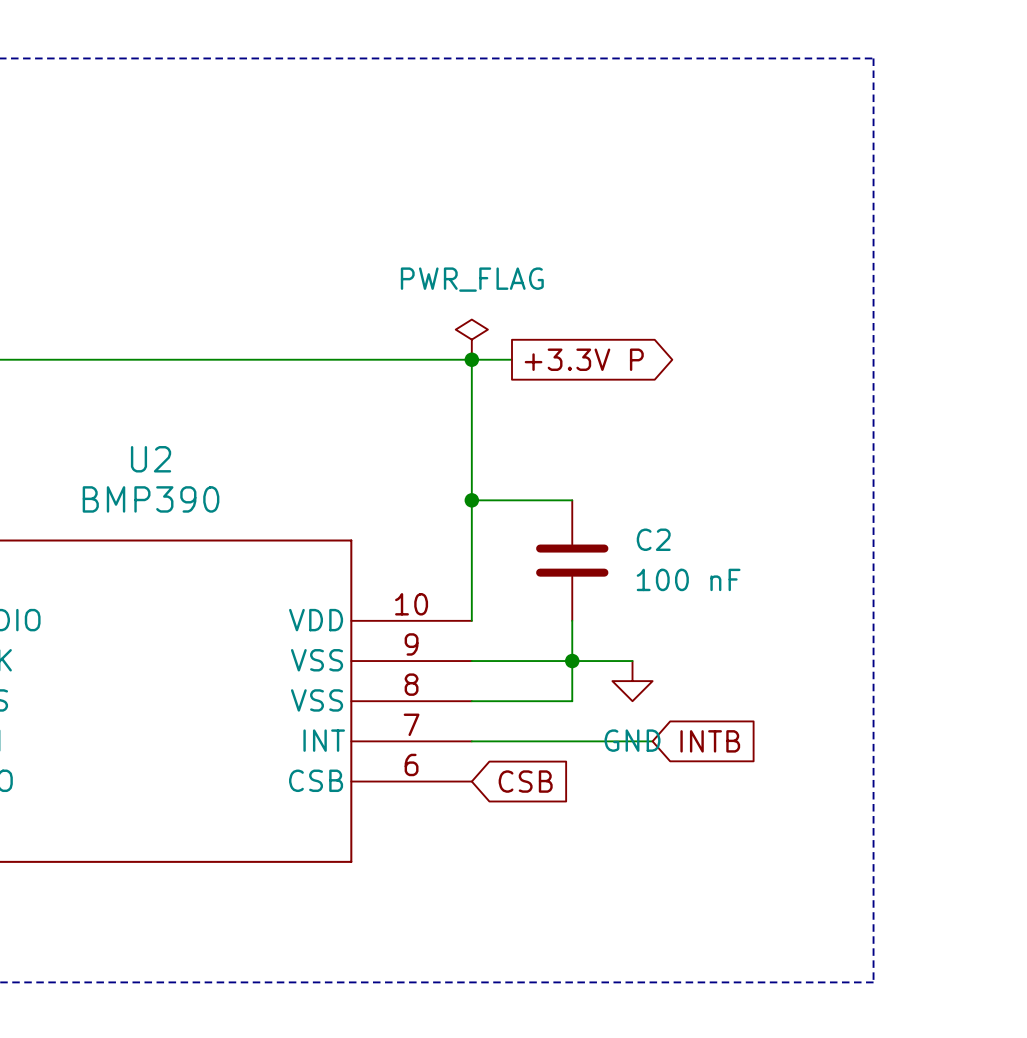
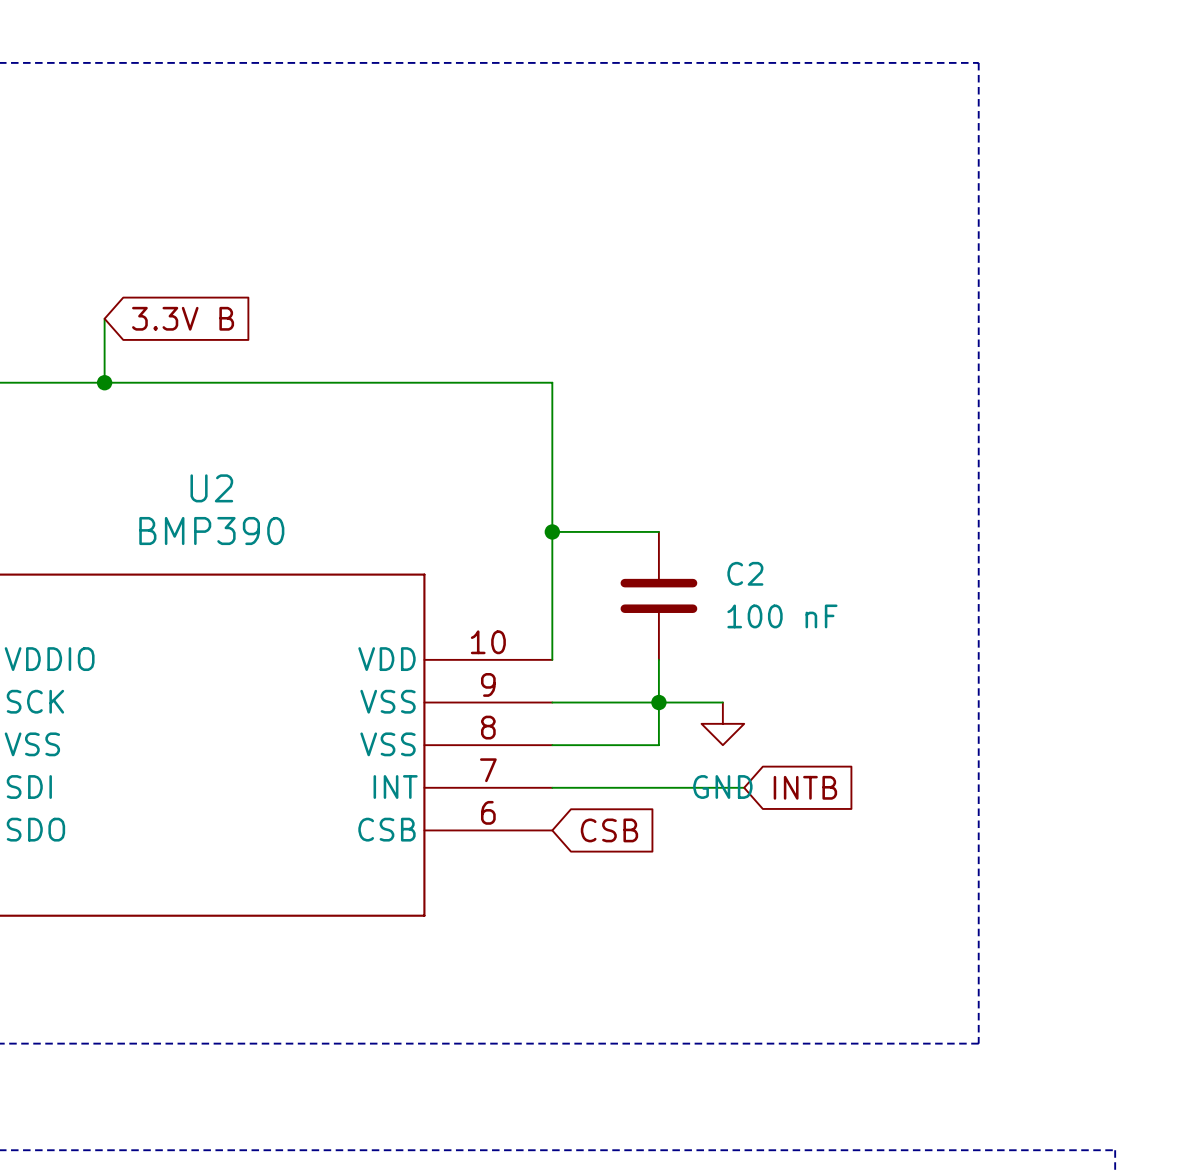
wire: none -> (104, 318) (104, 382)
global label: none -> 3.3V B (183, 318)
power symbol: PWR_FLAG (471, 339) -> none
junction: none -> (104, 382)
wire: (471, 359) (512, 359) -> none
junction: (471, 359) -> none
global label: +3.3V P (584, 359) -> none

